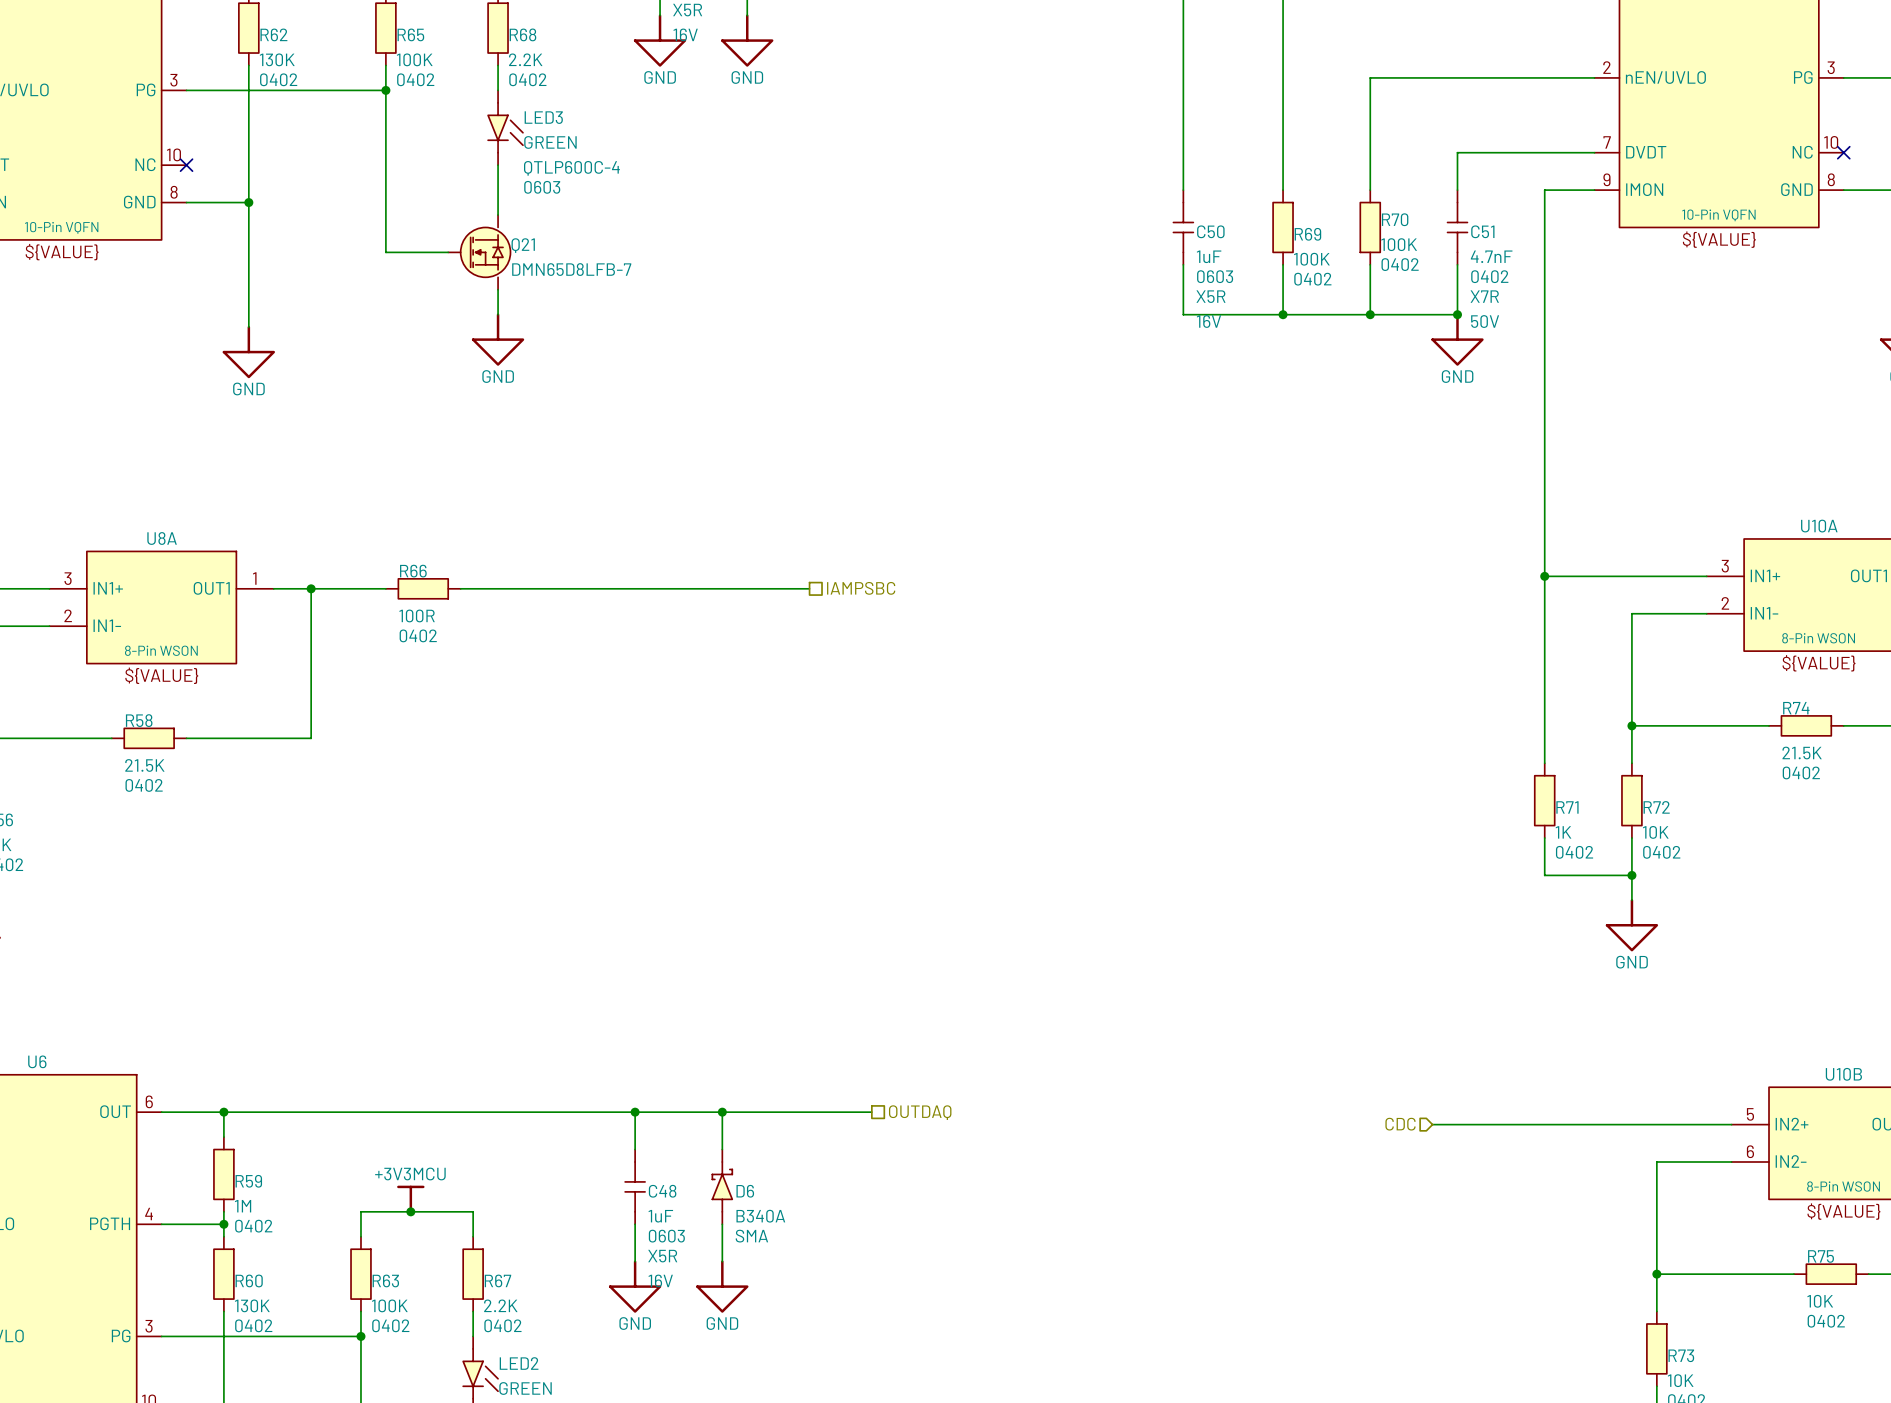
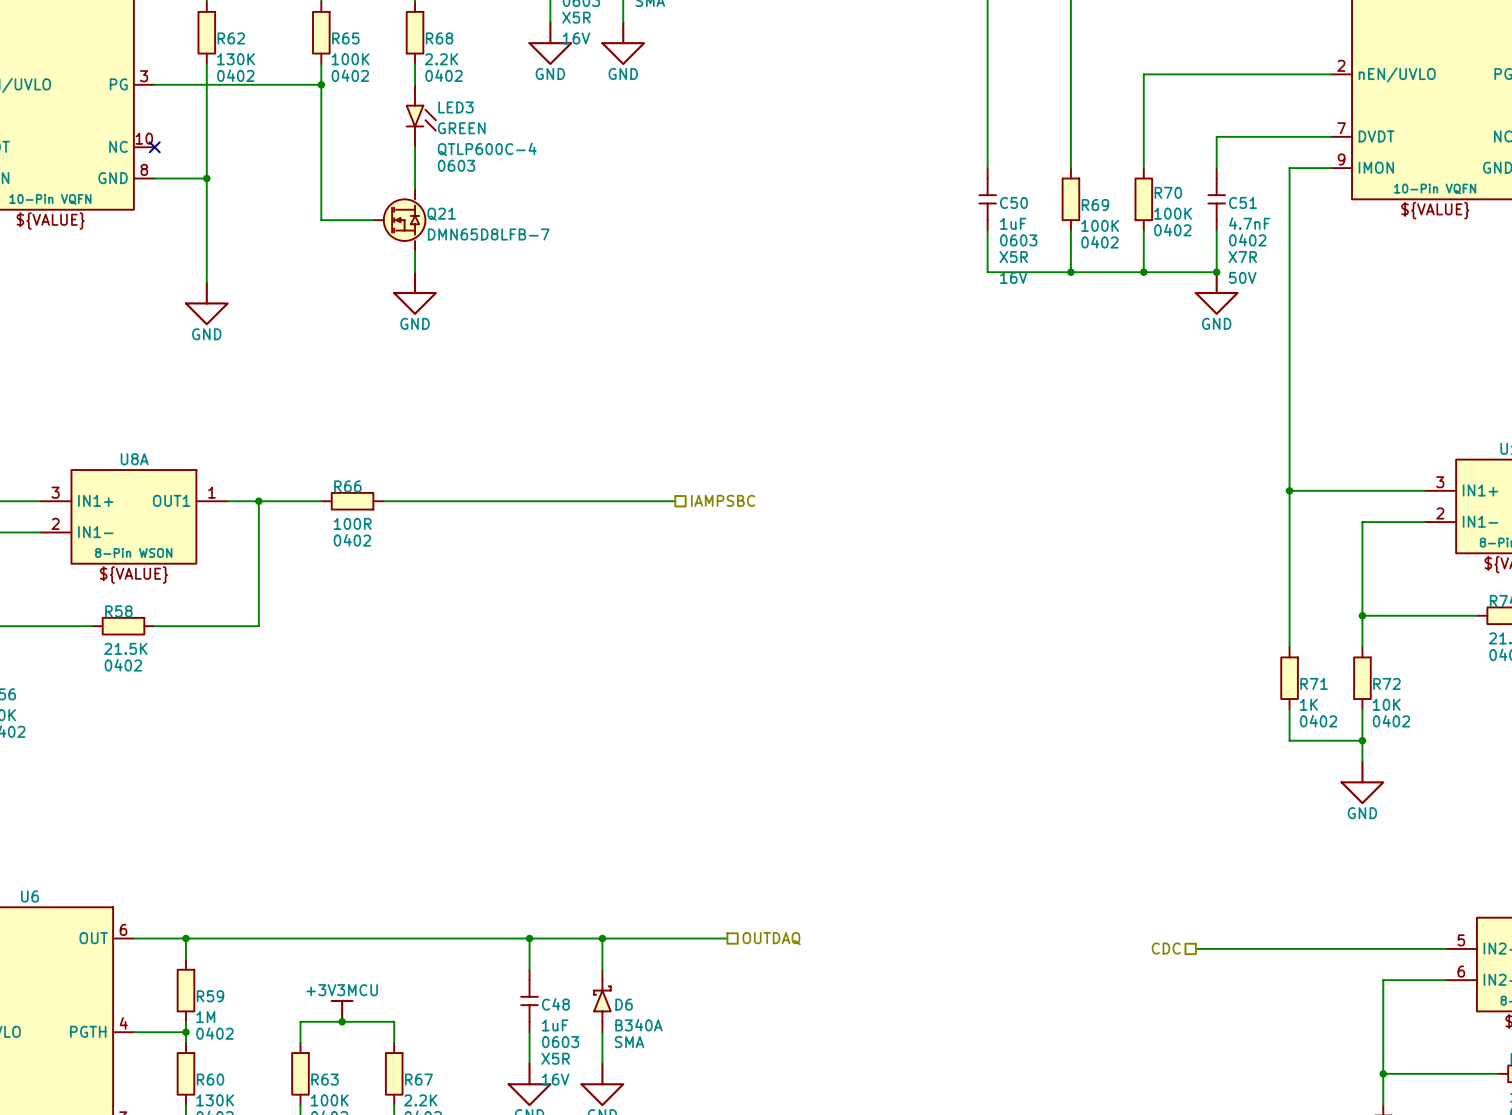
hierarchical label shape: input (1400, 1124) -> passive (1166, 948)

